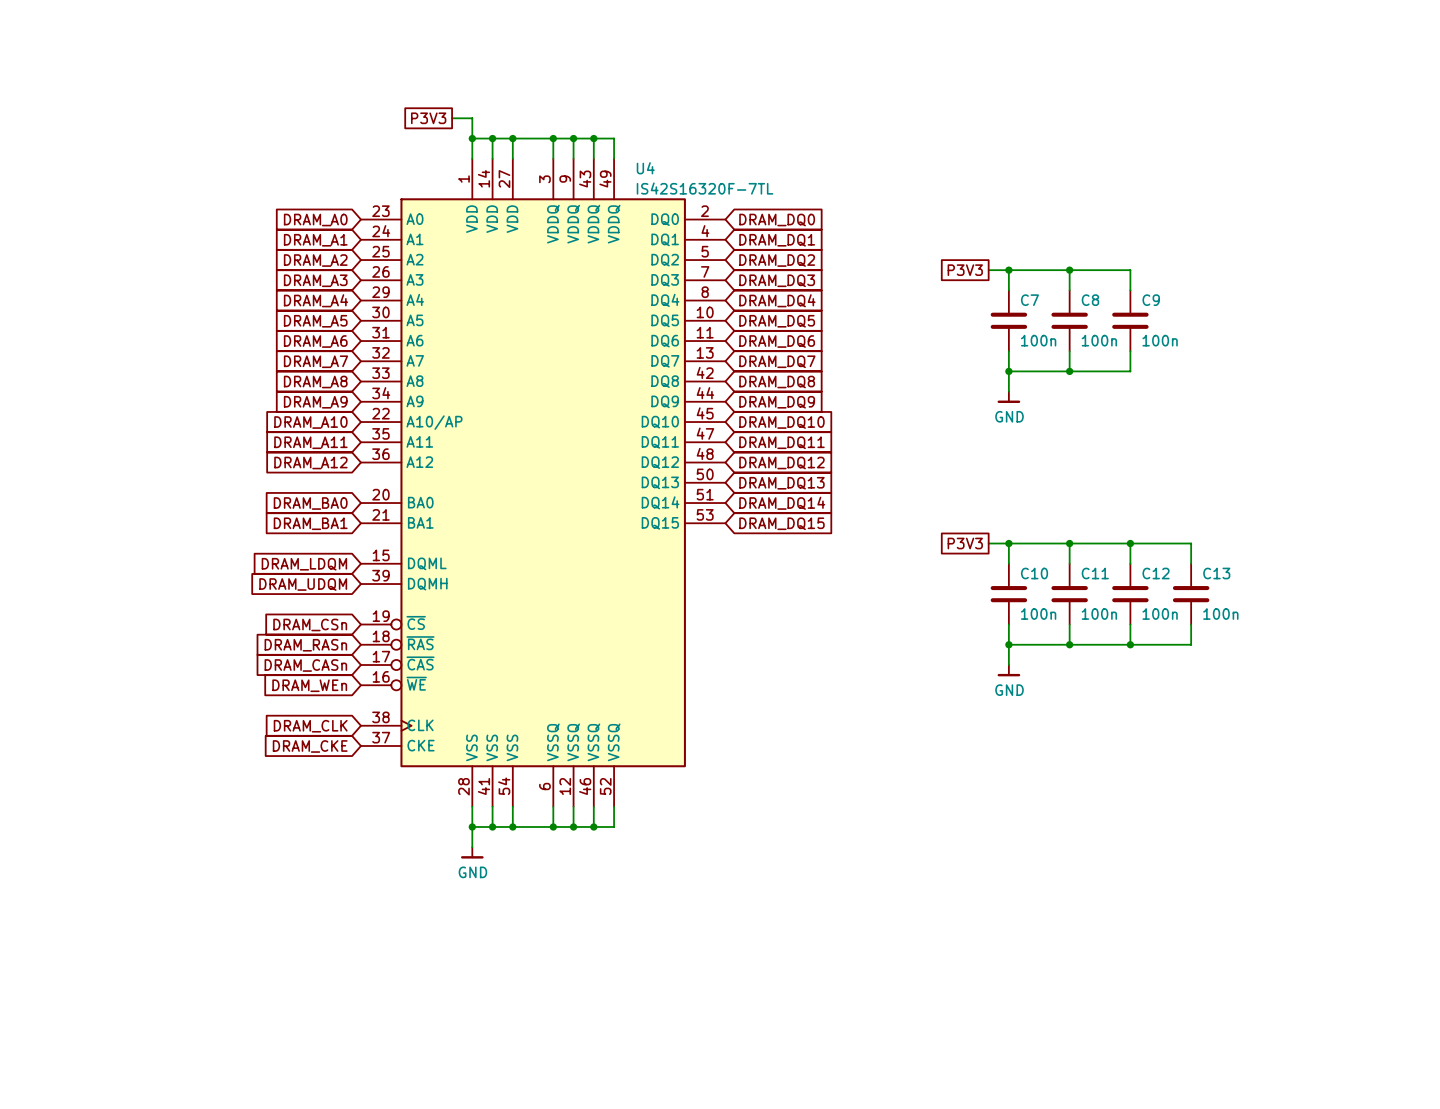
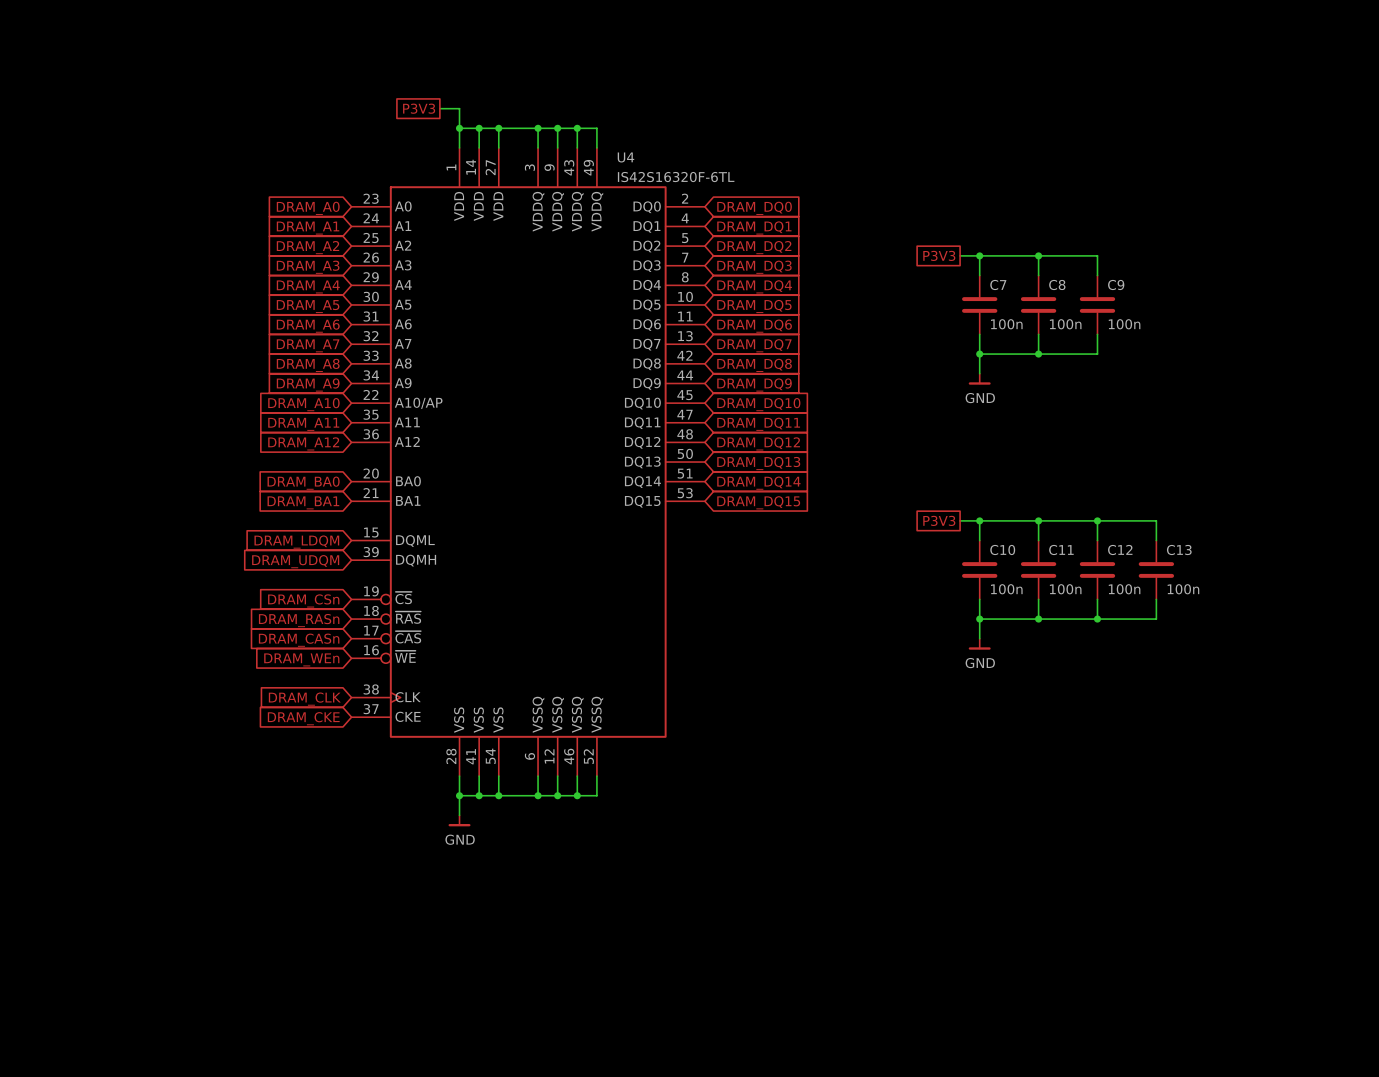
U4 value: IS42S16320F-7TL (705, 188) -> IS42S16320F-6TL (676, 177)

